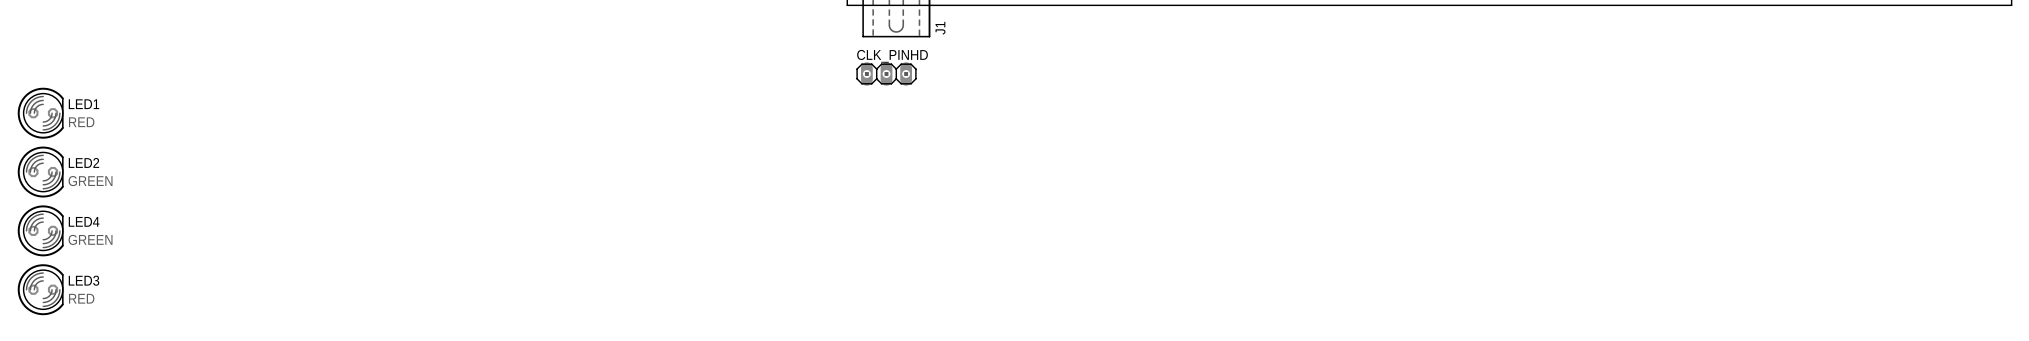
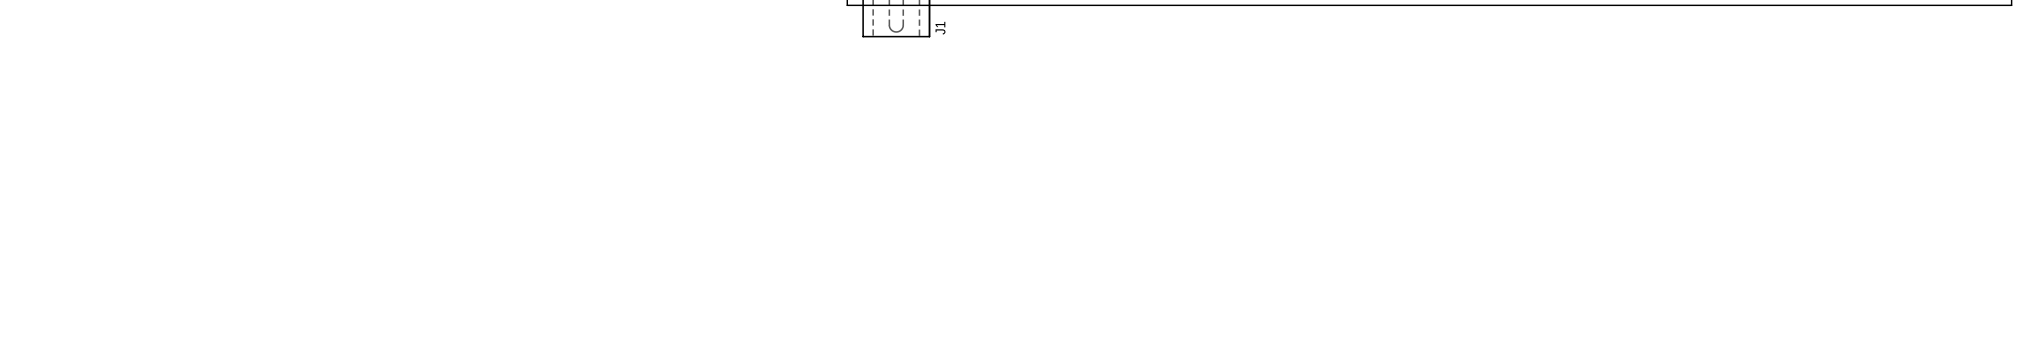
CLK_PINHD: (886, 73) -> none
LED1: RED (40, 113) -> none
LED2: GREEN (40, 172) -> none
LED4: GREEN (40, 230) -> none
LED3: RED (40, 289) -> none

